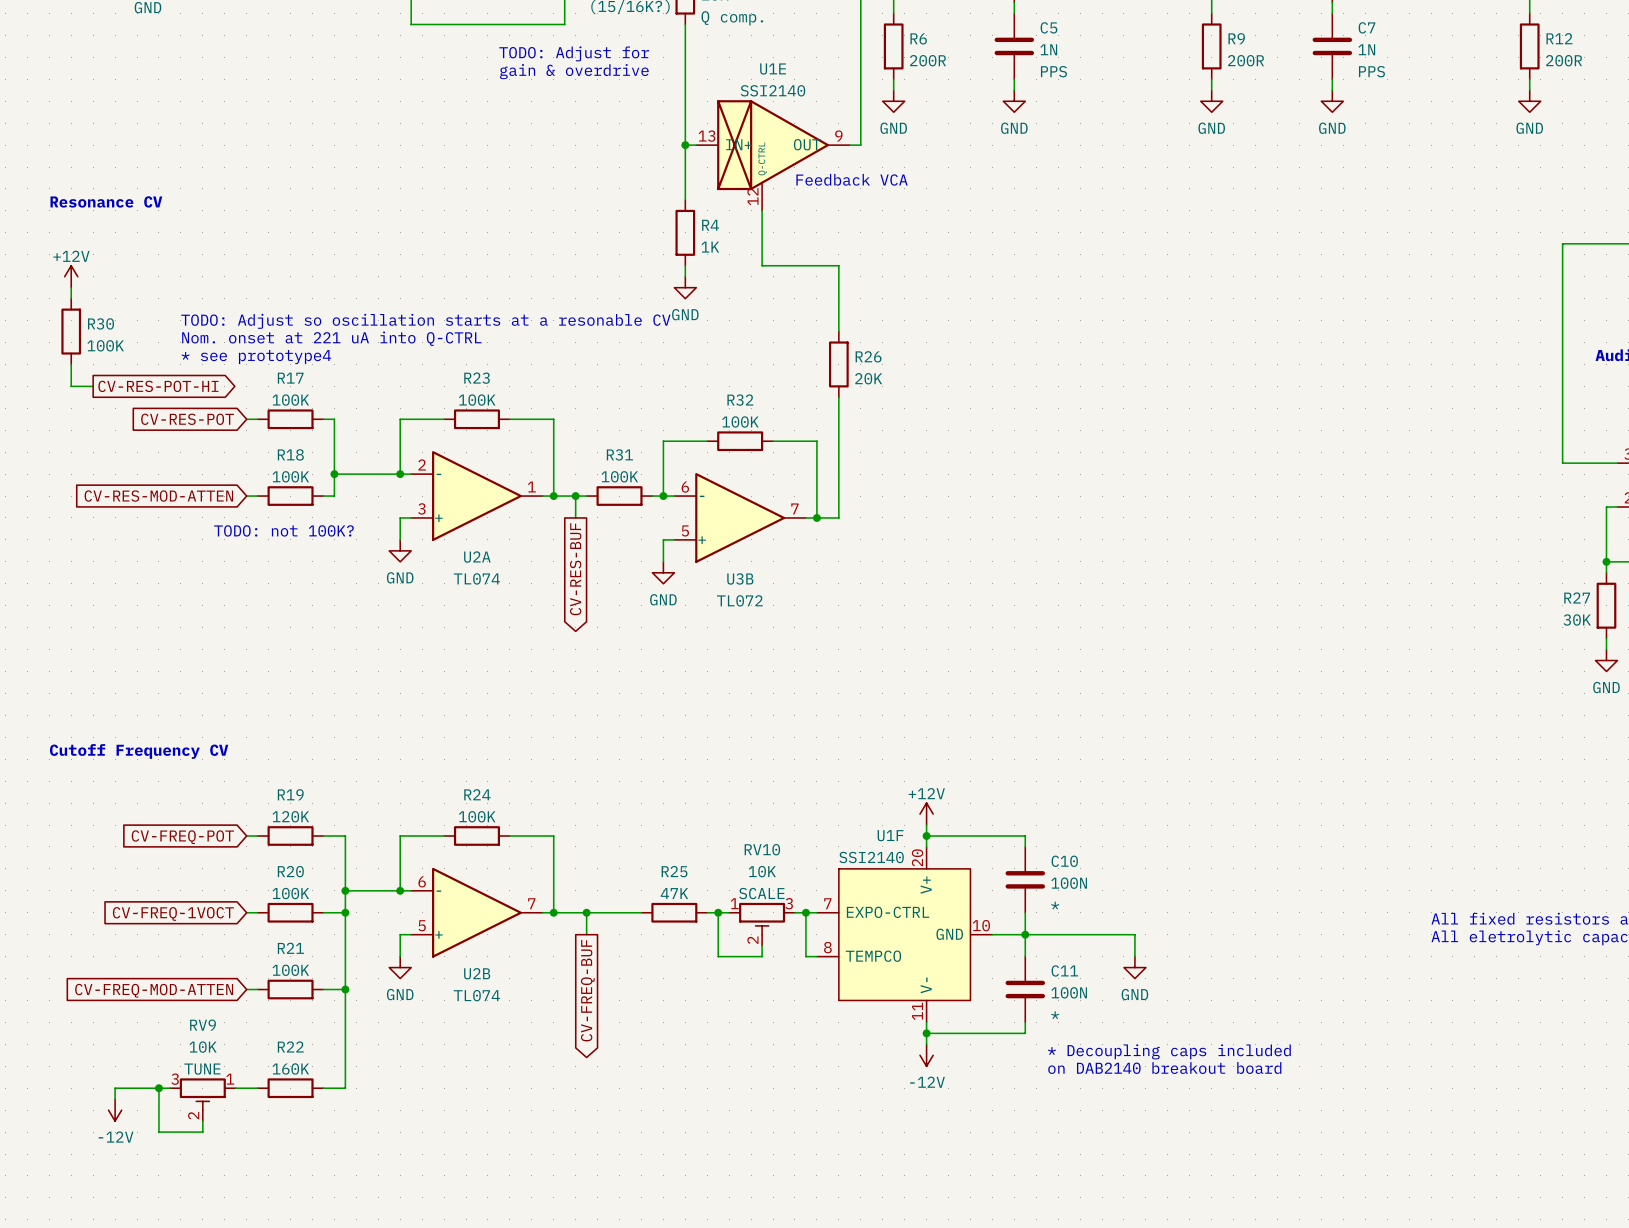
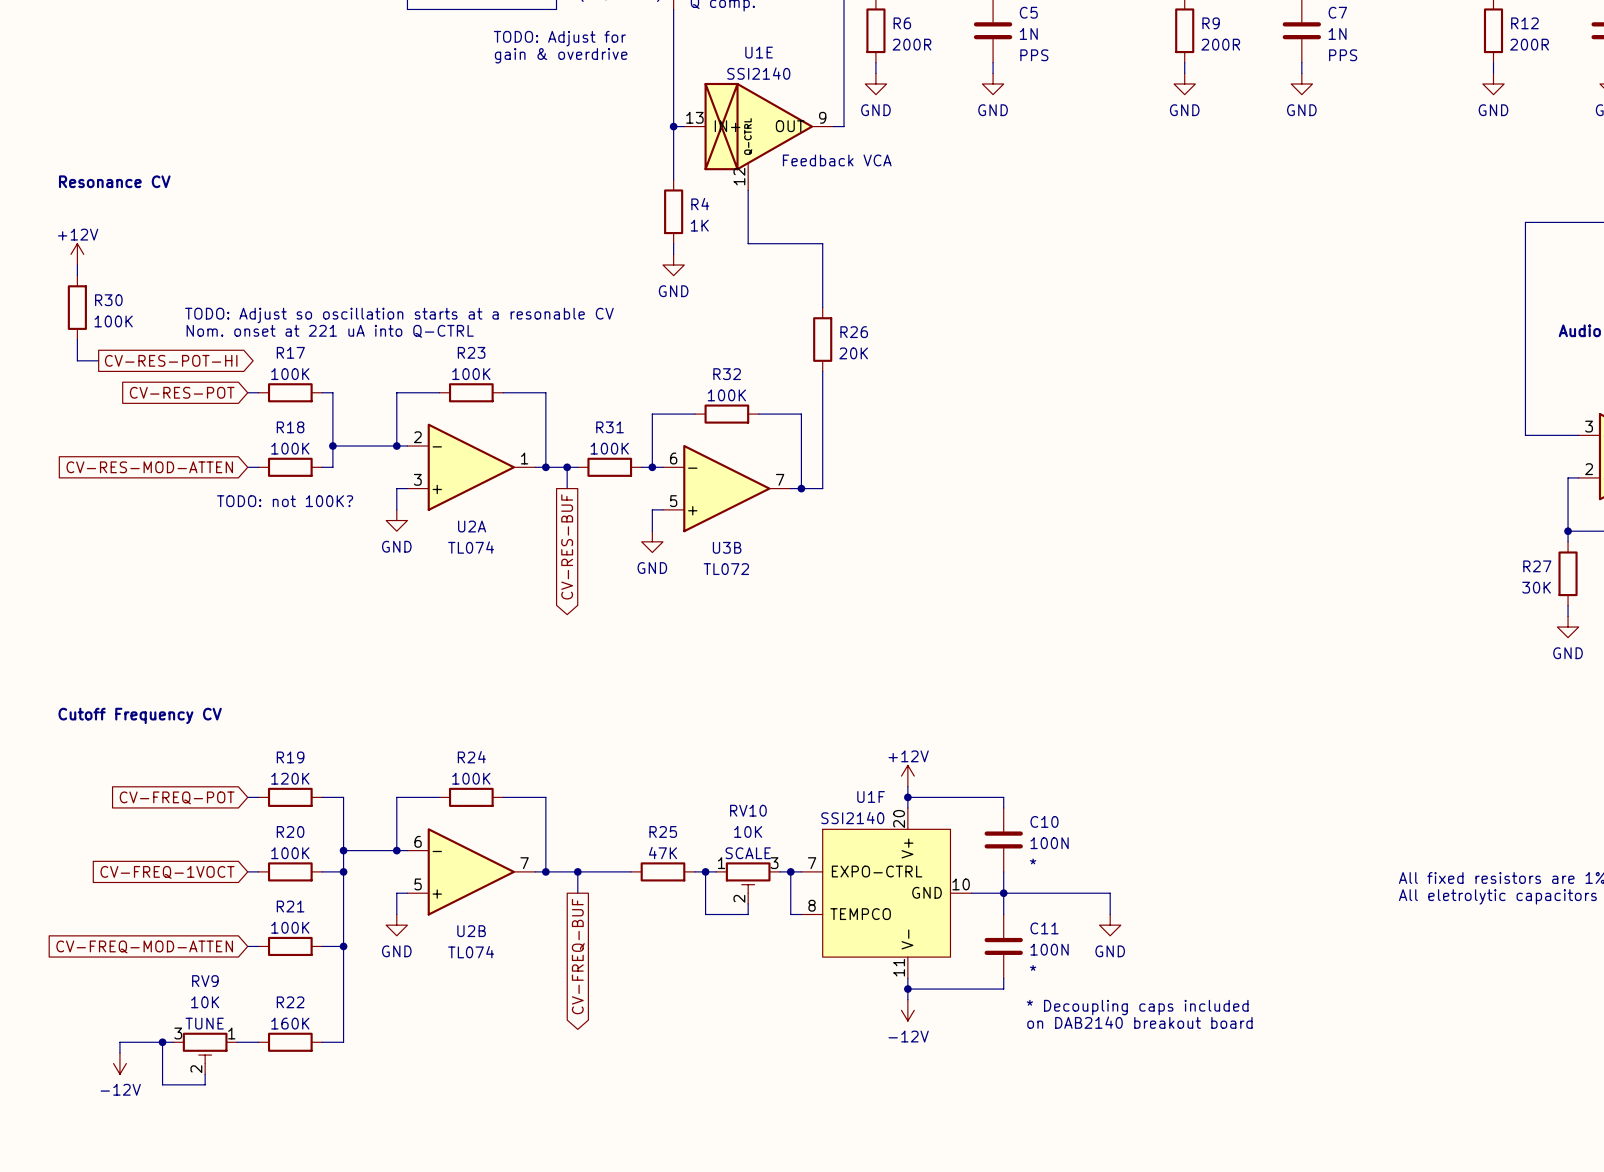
text: TODO: Adjust so oscillation starts at a resonable CV (425, 321) -> none
text: Nom. onset at 221 uA into Q-CTRL (331, 338) -> TODO: Adjust so oscillation starts at a resonable CV (399, 315)
text: * see prototype4 (256, 357) -> Nom. onset at 221 uA into Q-CTRL (330, 331)

